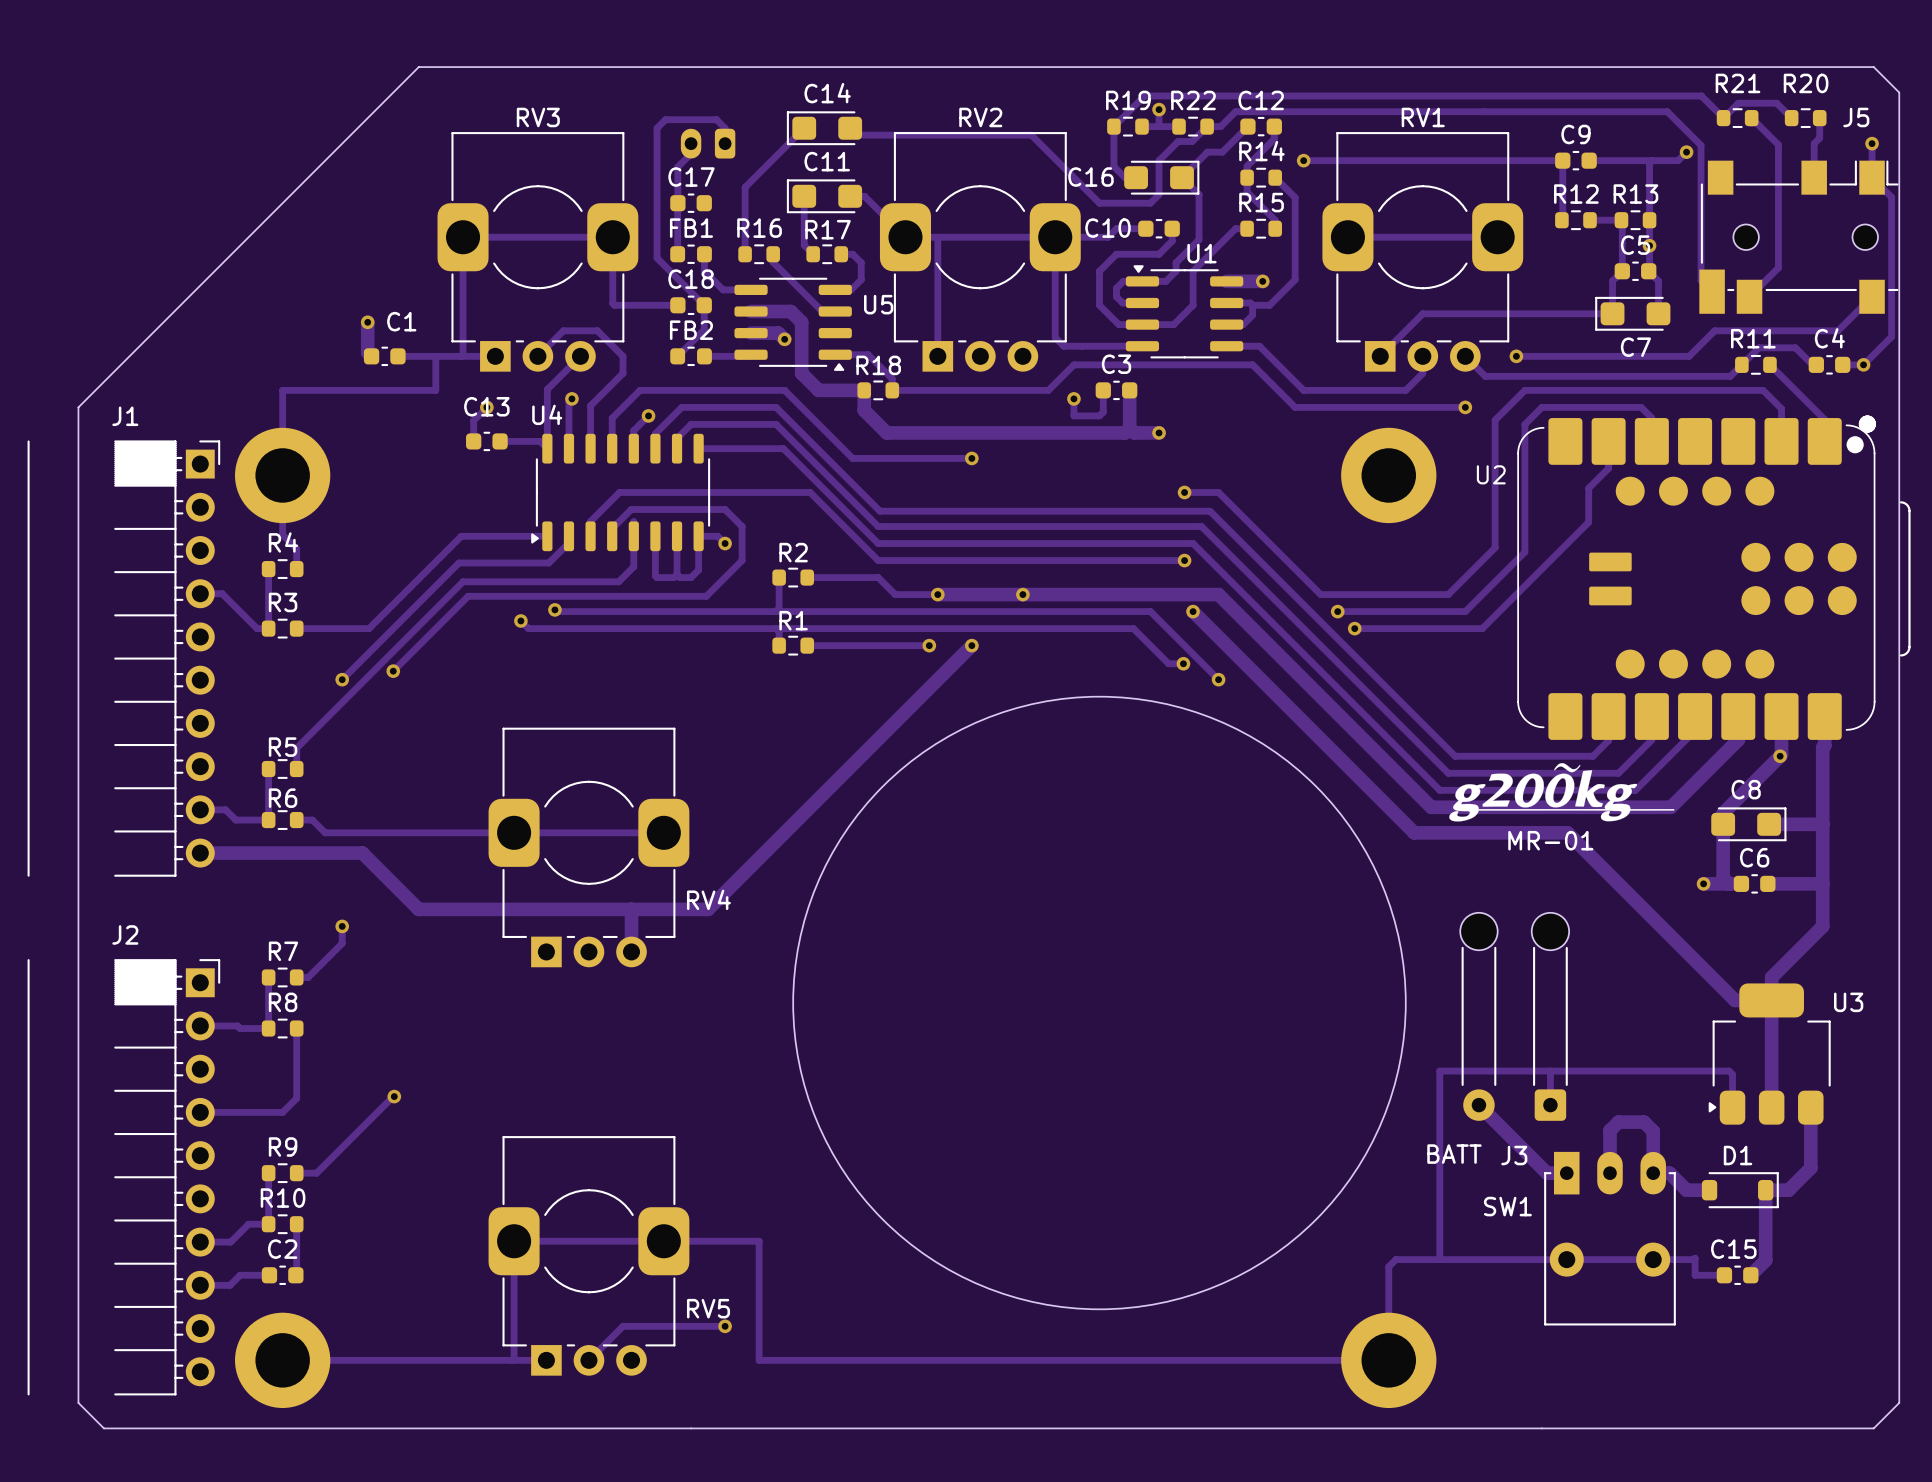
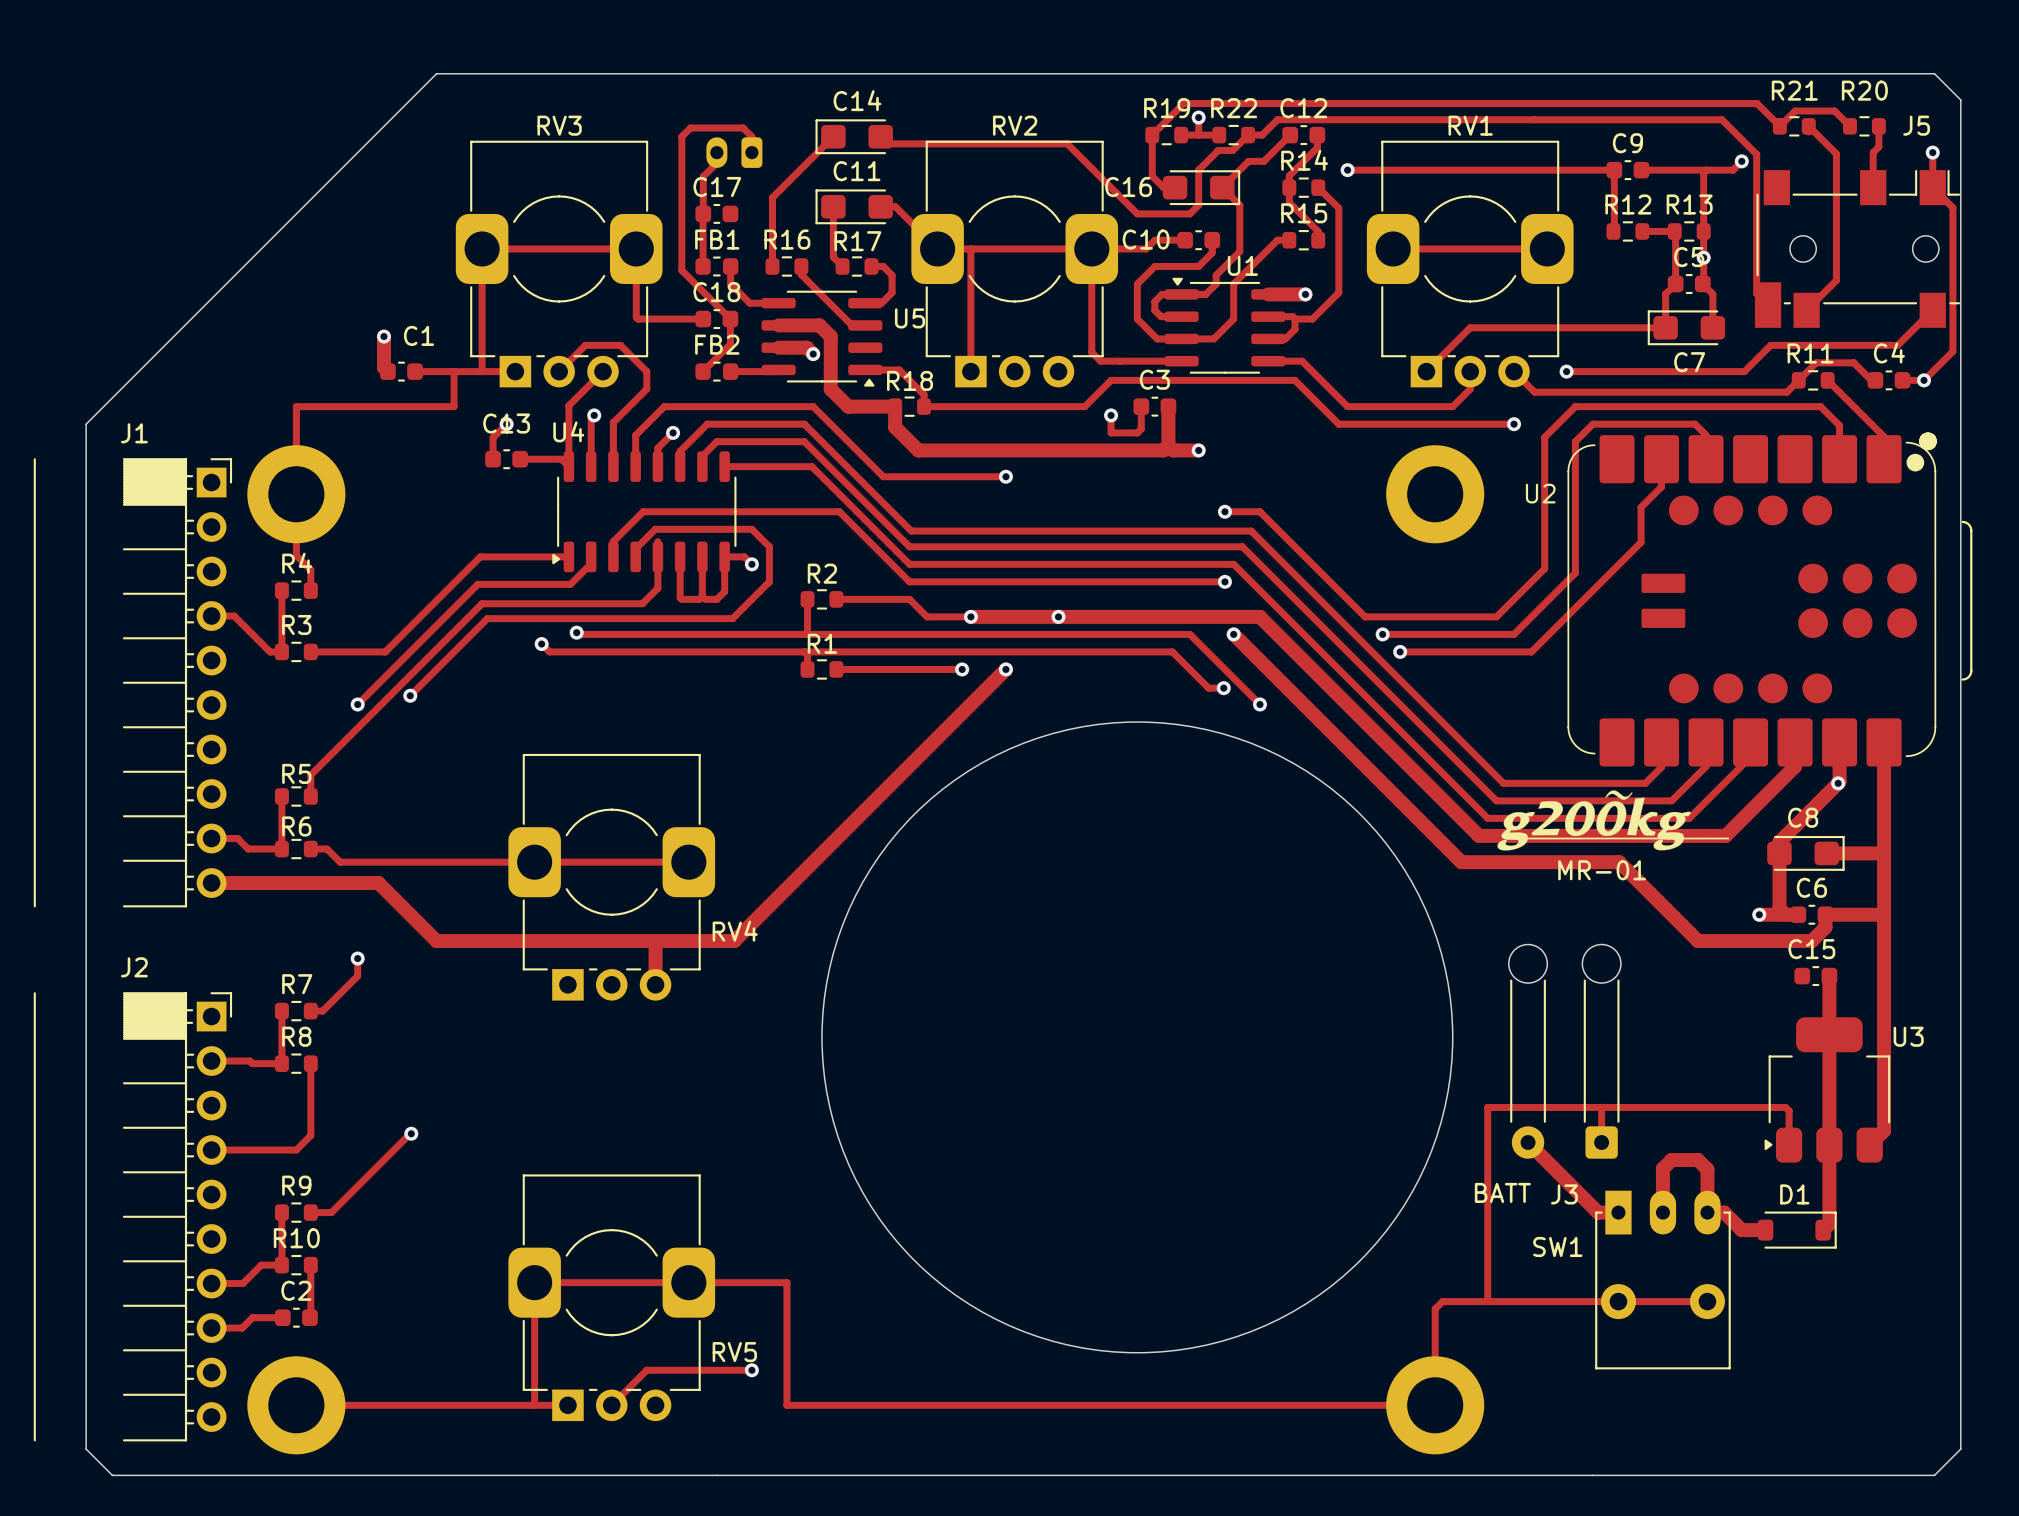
track: (1824, 745) (1822, 747) (1822, 926) (1771, 977) -> (1884, 772) (1884, 1130) (1869, 1145)
track: (1644, 909) (1735, 1000) (1771, 1000) -> (1698, 941) (1811, 941) (1825, 927) (1825, 914)
track: none -> (1829, 976) (1829, 1011)
track: none -> (1829, 1145) (1829, 1223) (1823, 1230)
track: (1810, 1107) (1810, 1168) (1788, 1190) (1765, 1190) (1765, 1260) (1750, 1275) -> none
track: (1653, 1259) (1695, 1258) (1695, 1275) (1724, 1275) -> none
C15 position: (1737, 1275) -> (1815, 976)

